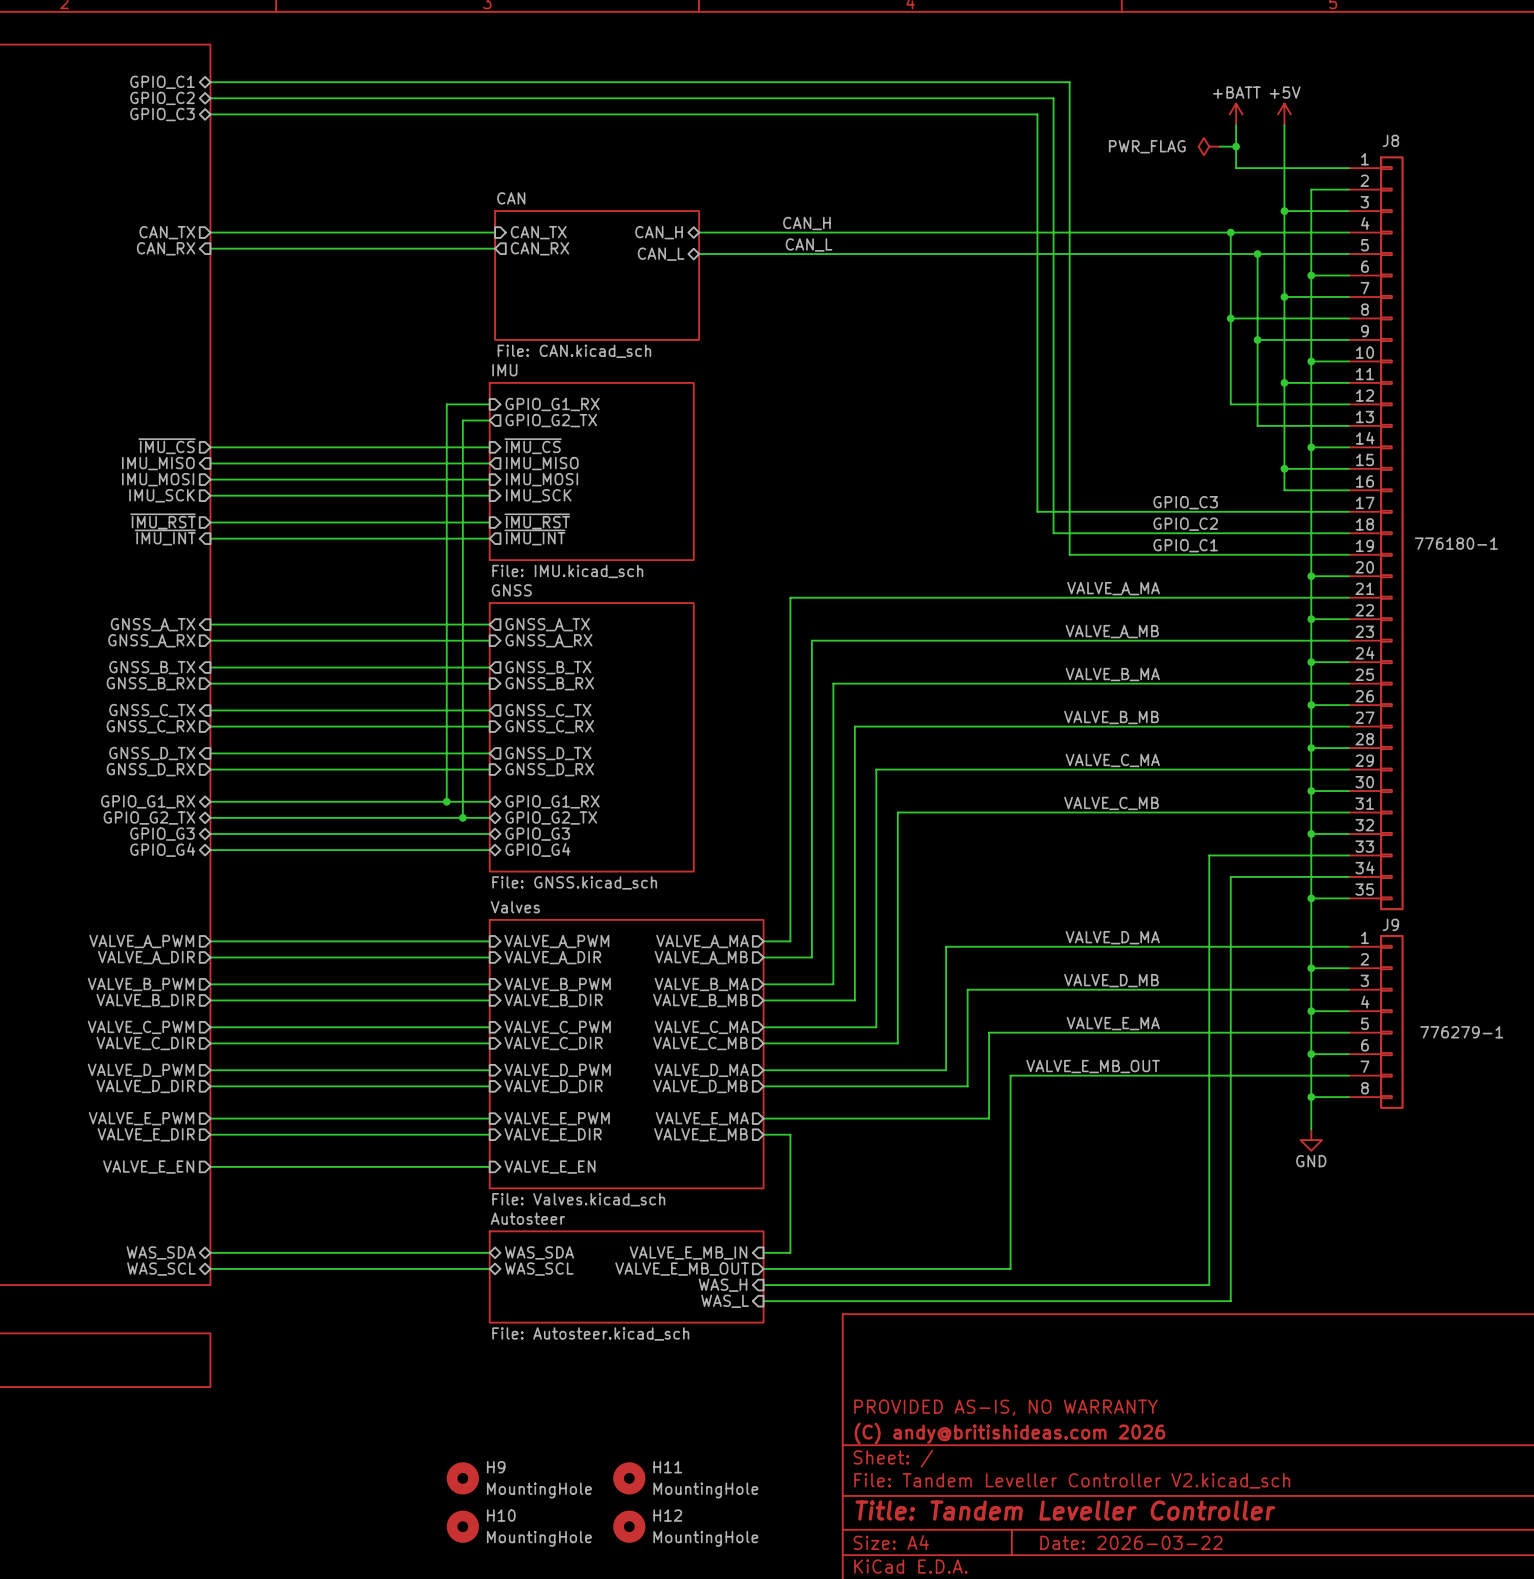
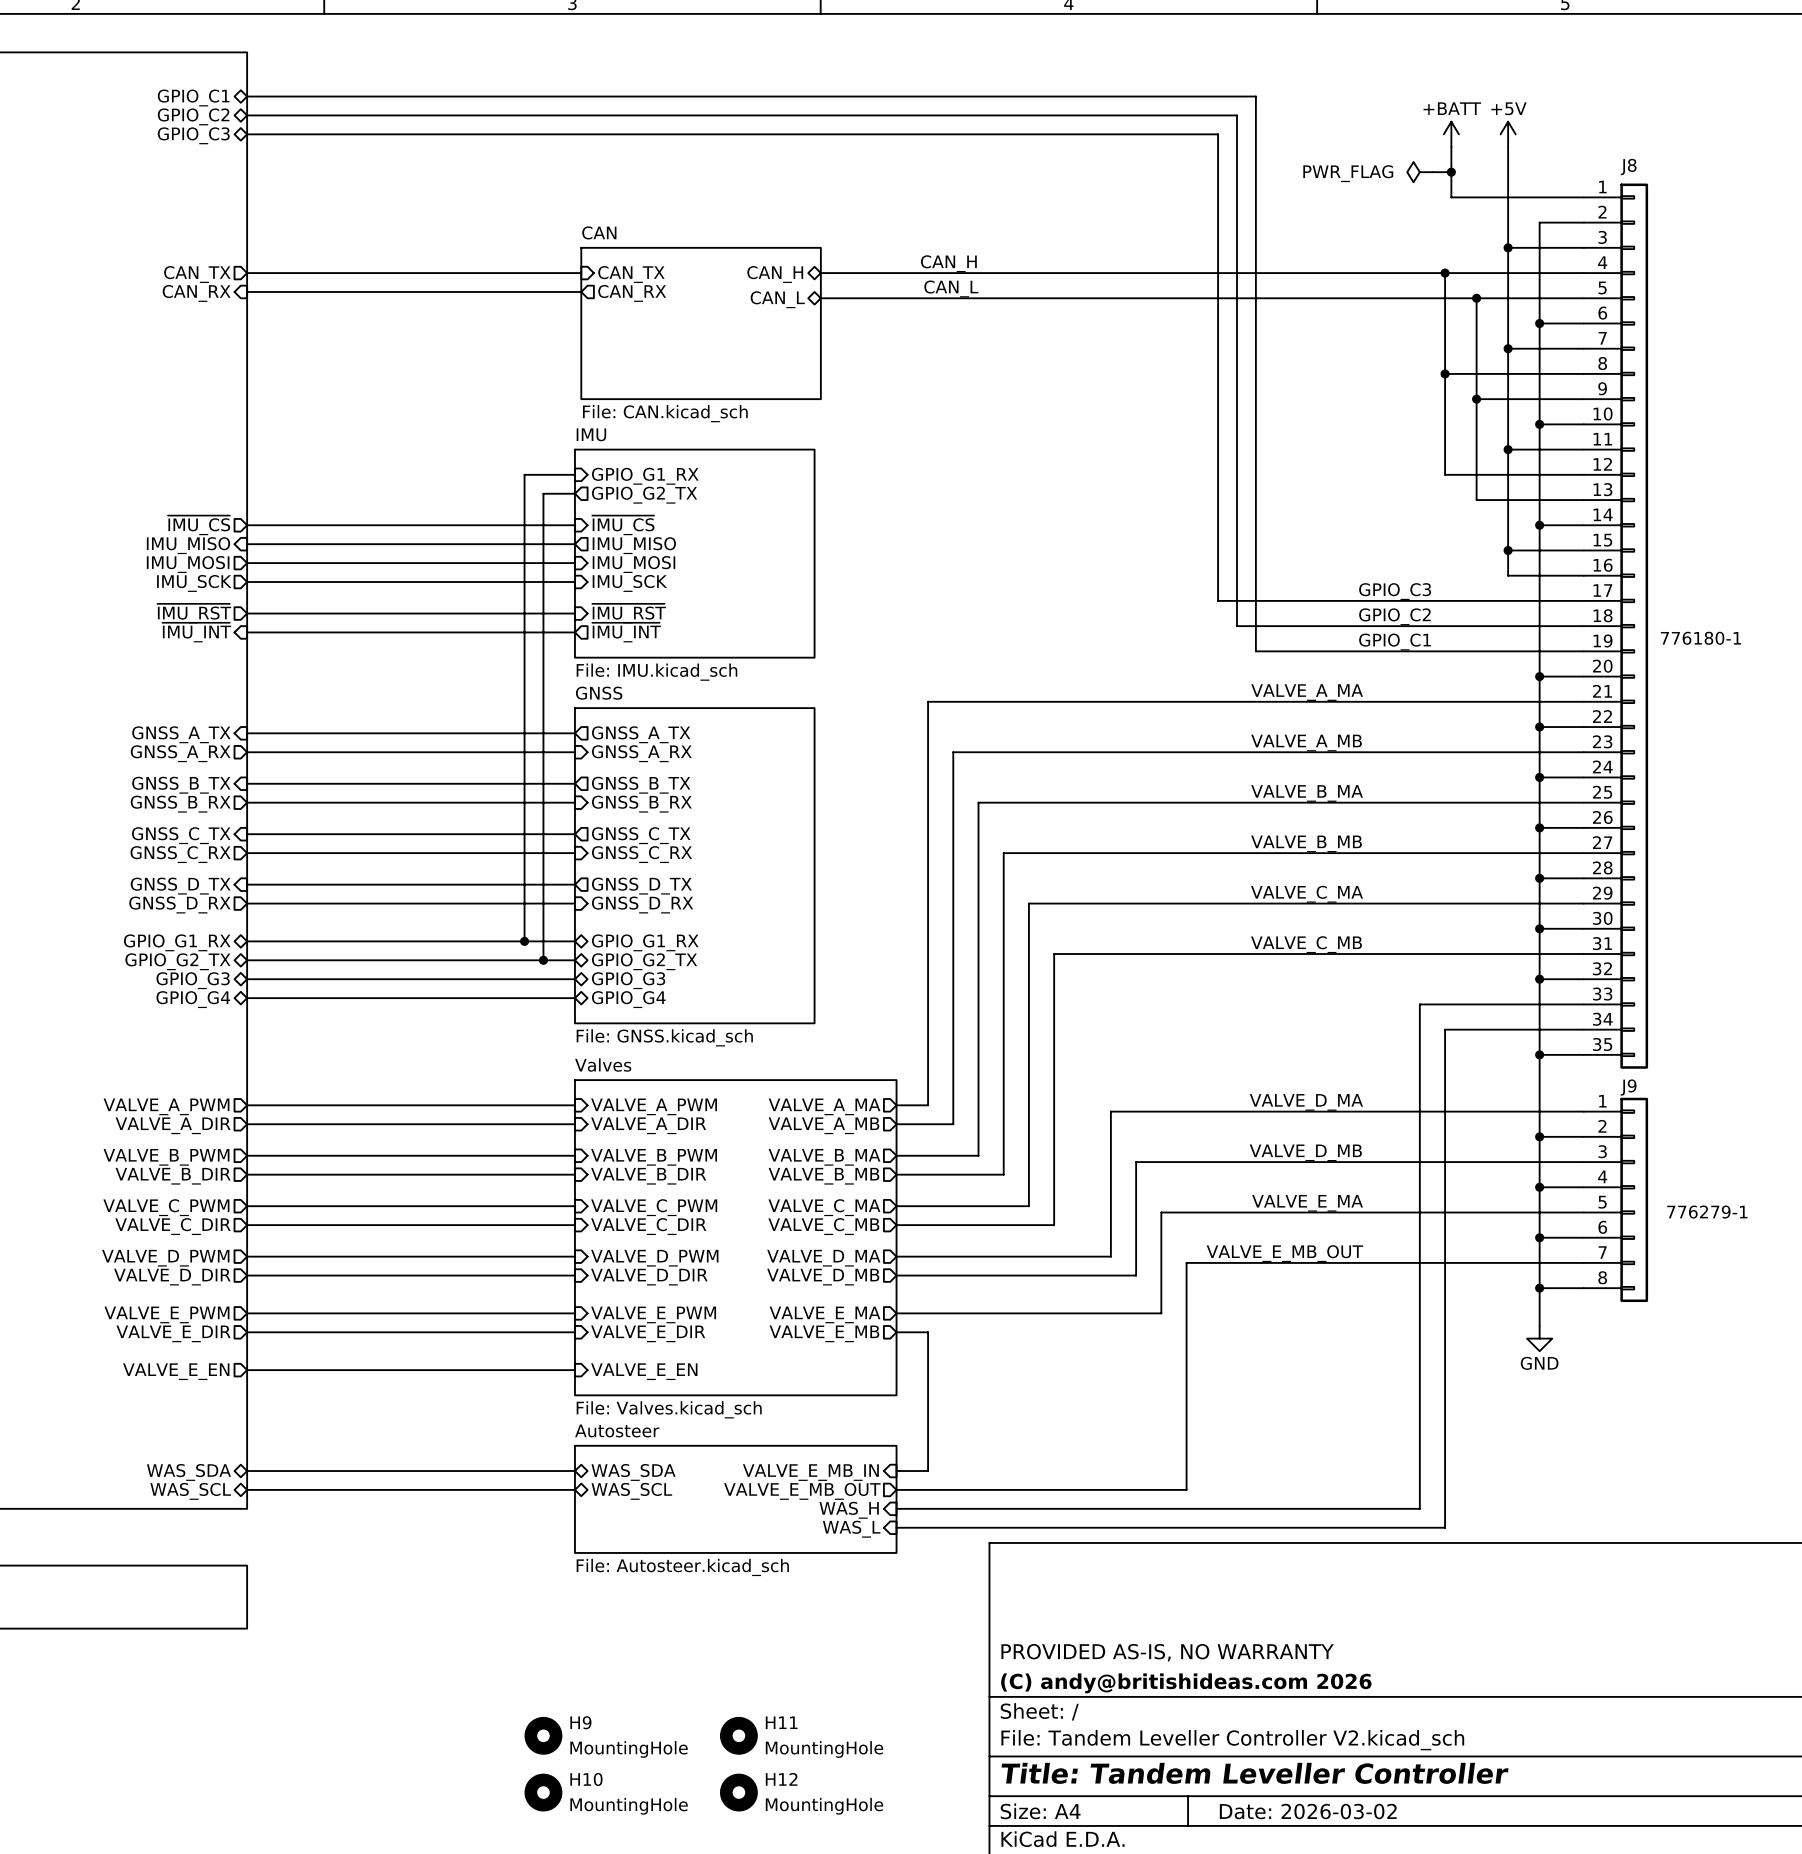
title block: Date: 2026-03-22 (1131, 1542) -> Date: 2026-03-02 (1308, 1811)

